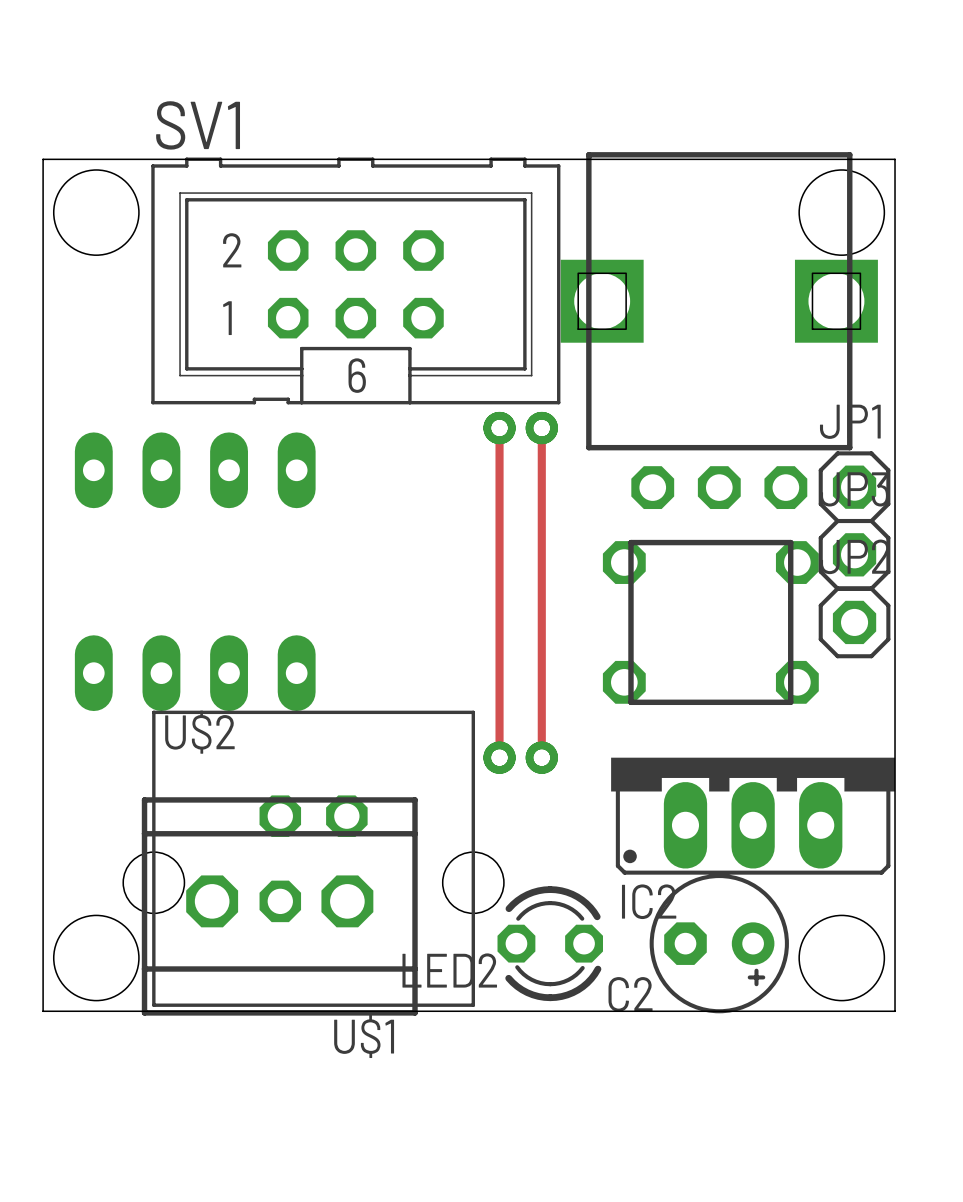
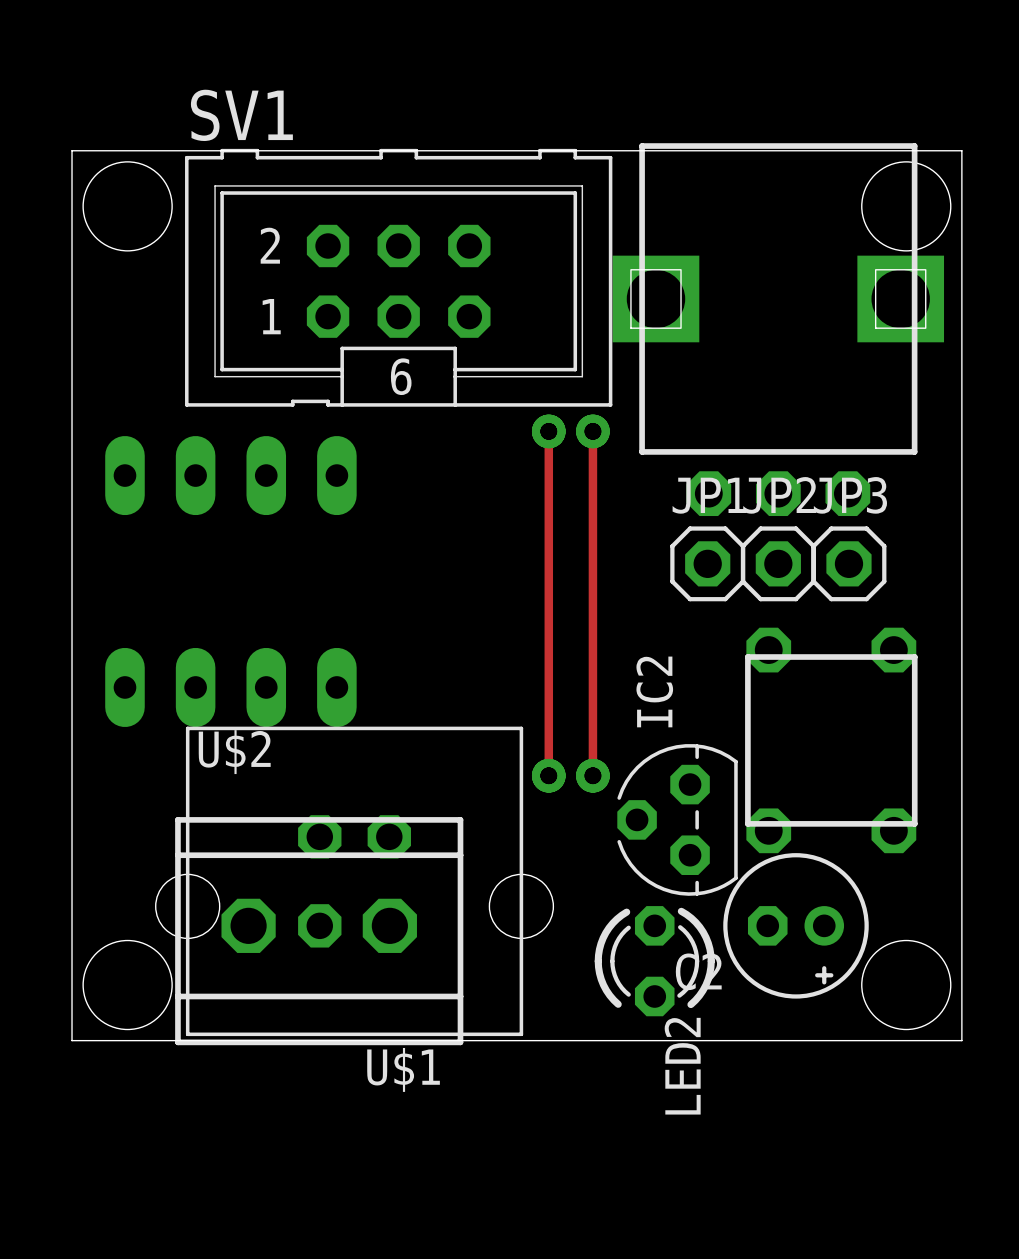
JP1 position: (854, 487) -> (707, 563)
JP3 position: (854, 554) -> (848, 563)
part rotation: 0° (710, 622) -> 90° clockwise (831, 740)
JP2 position: (854, 622) -> (778, 563)
IC2 footprint: [611, 757, 896, 875] -> [617, 744, 738, 896]
C2 footprint: [649, 873, 789, 1014] -> [723, 853, 869, 999]
IC2 name position: IC2 (649, 901) -> IC2 (654, 691)
LED2 rotation: 0° (550, 943) -> 90° counterclockwise (654, 961)

